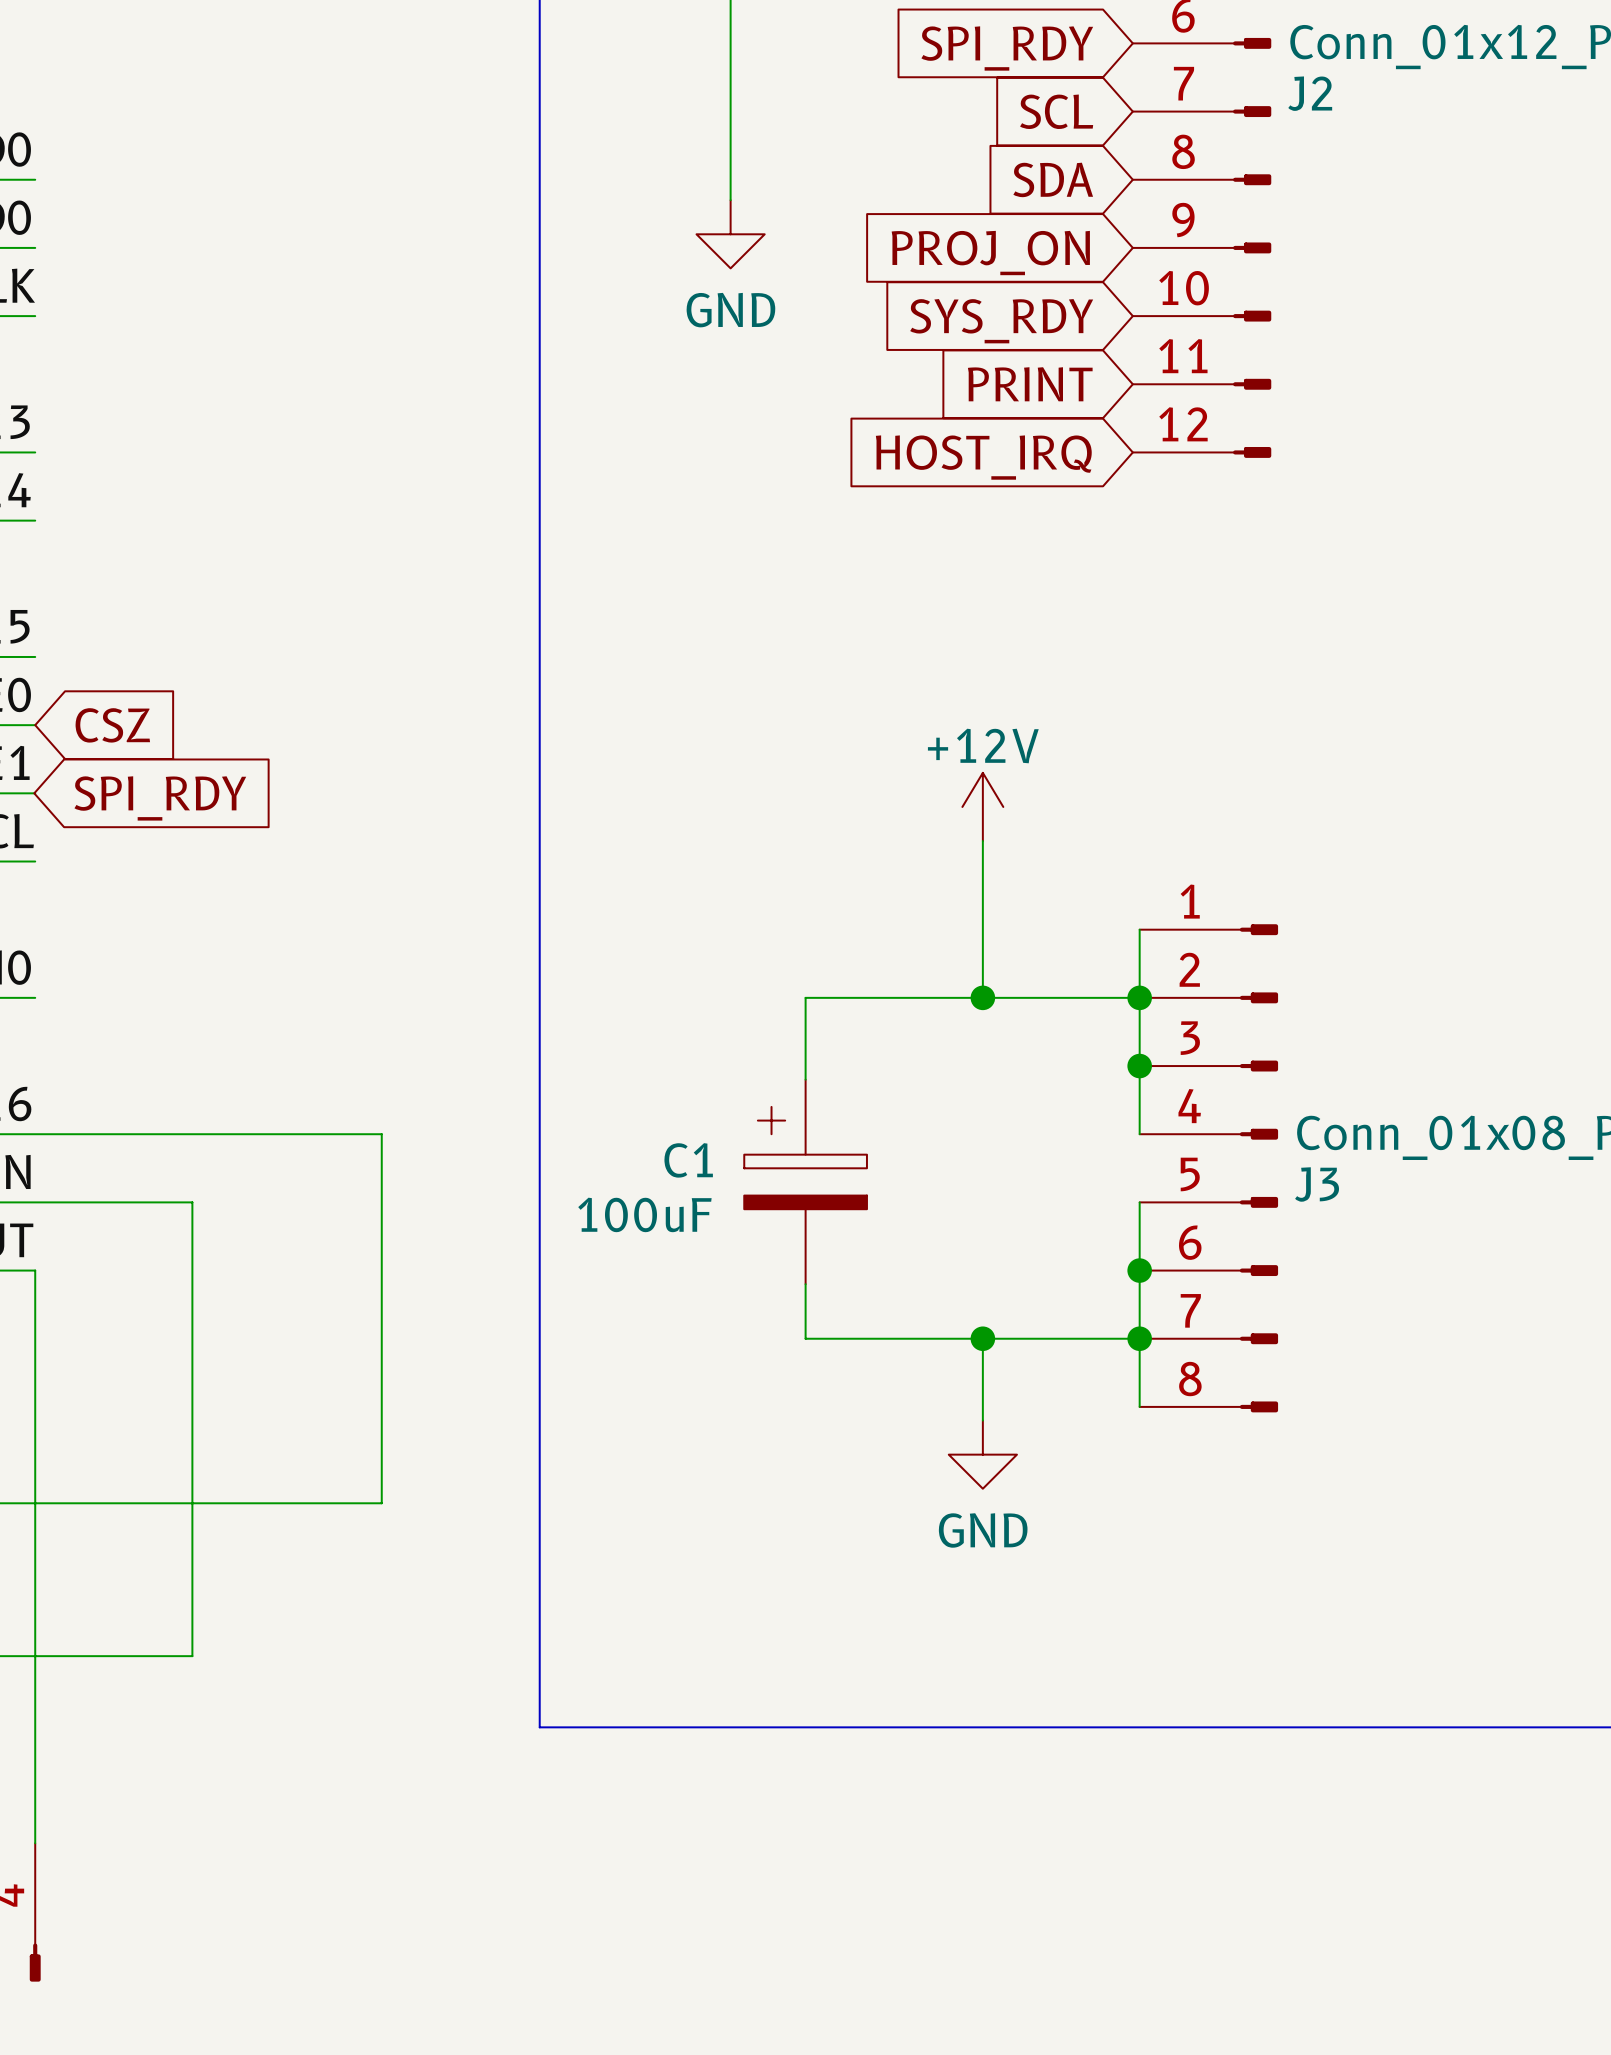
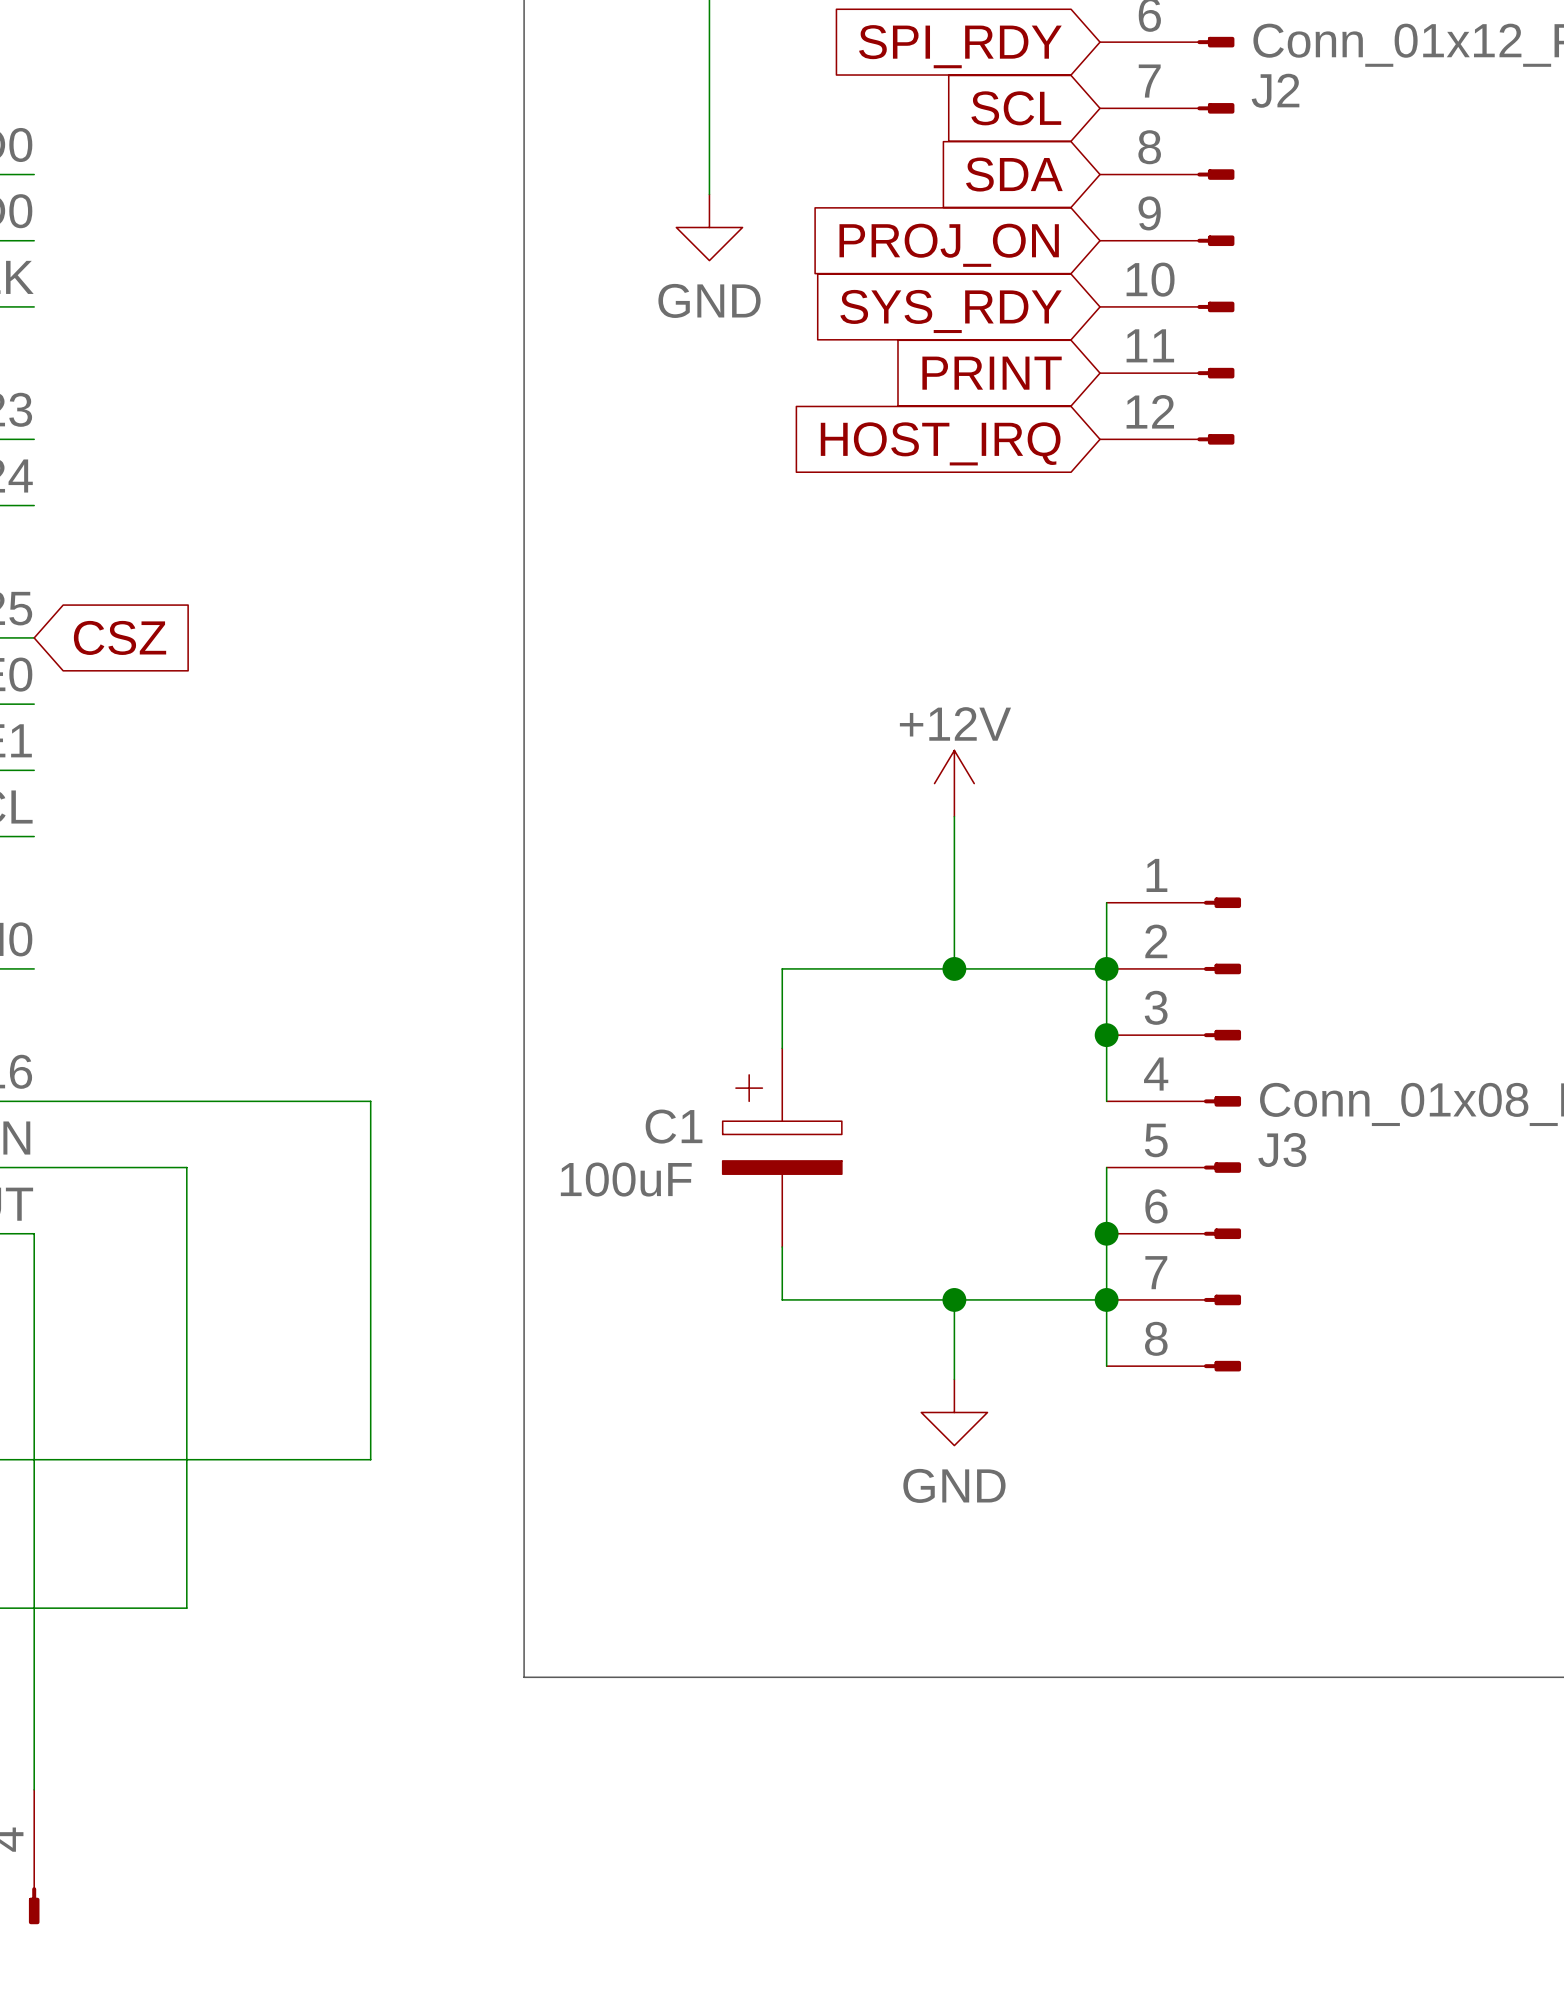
global label position: CSZ (112, 725) -> CSZ (120, 637)
global label: SPI_RDY (160, 798) -> none

